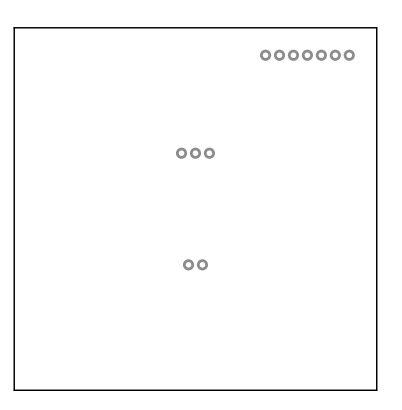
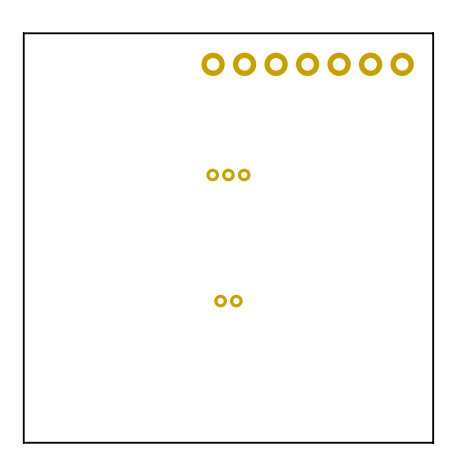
part: none -> (307, 64)
part: (307, 55) -> none

